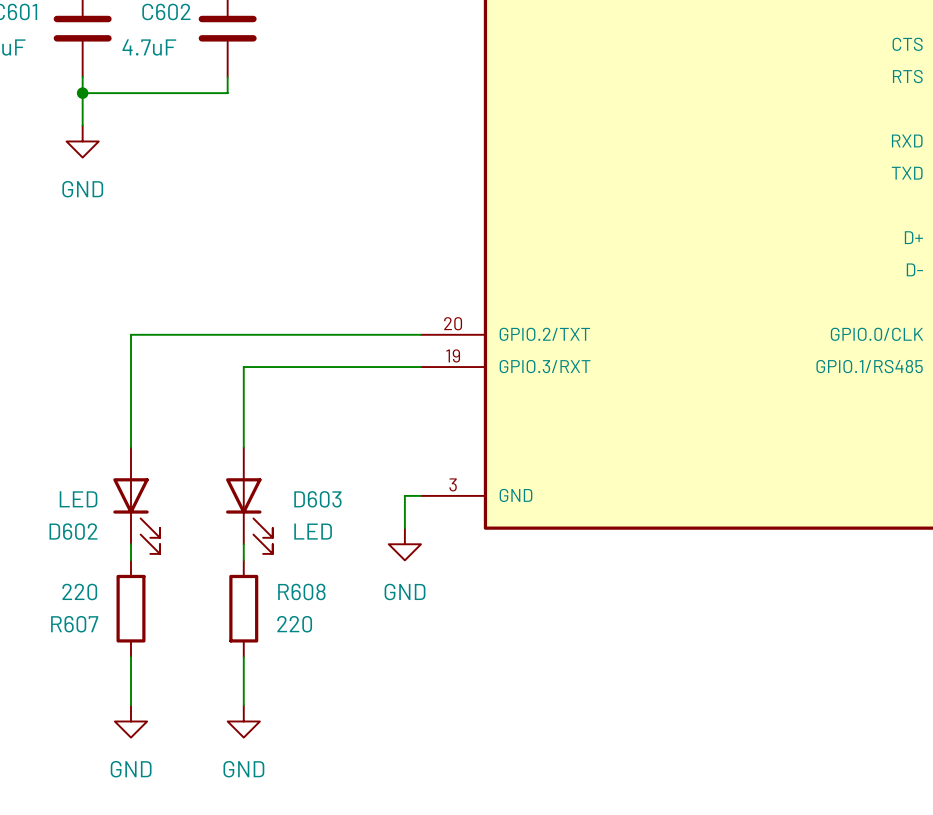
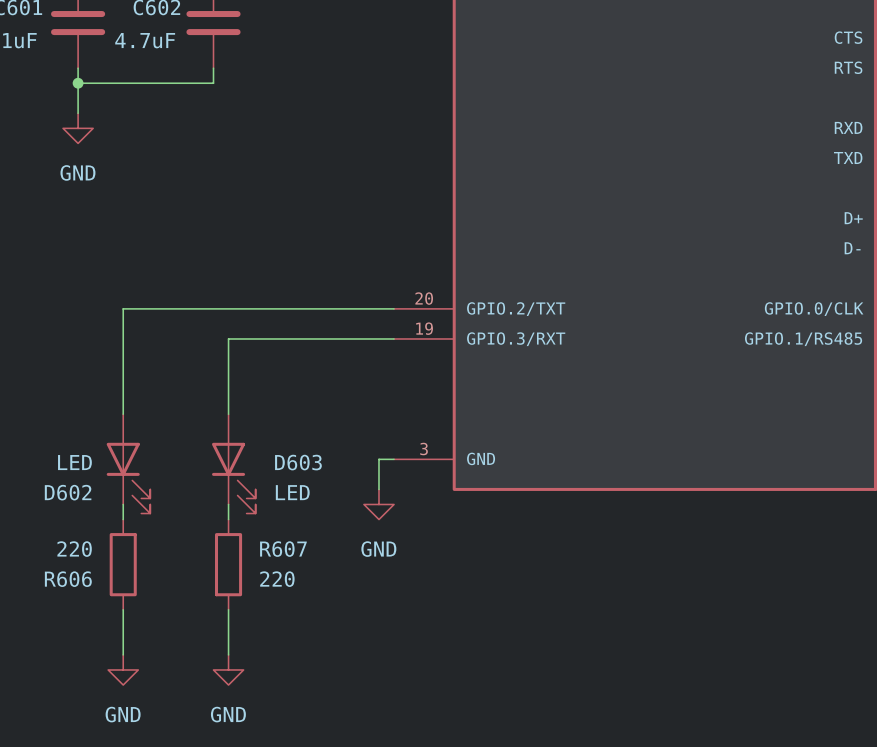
R608 name: R608 (301, 591) -> R607 (283, 549)
R607 name: R607 (74, 624) -> R606 (68, 579)

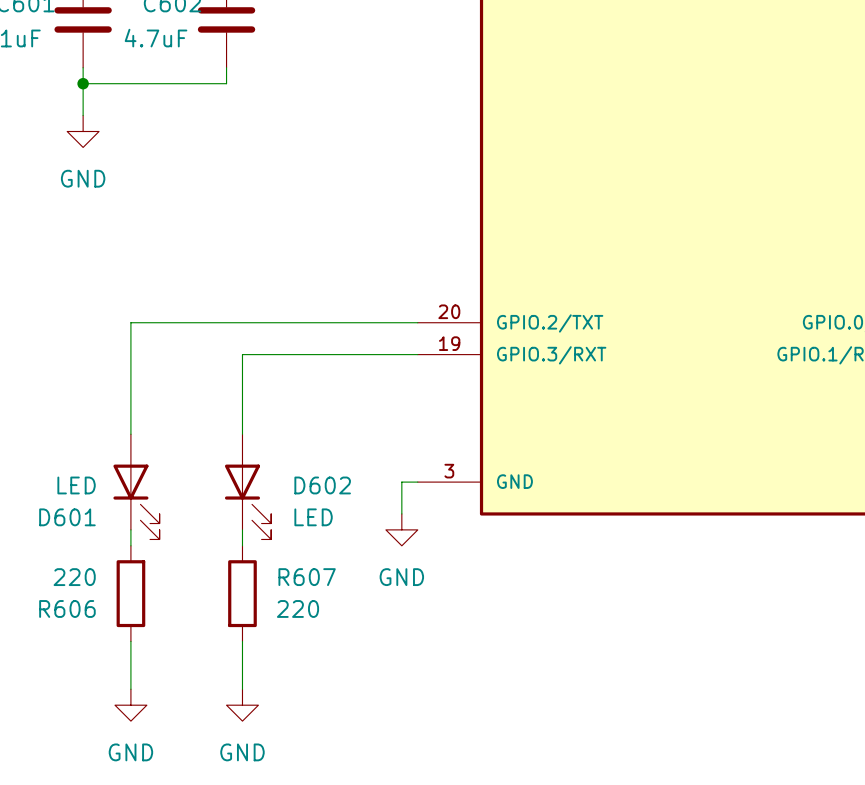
D603 name: D603 (298, 462) -> D602 (322, 485)
D602 name: D602 (68, 492) -> D601 (67, 517)

